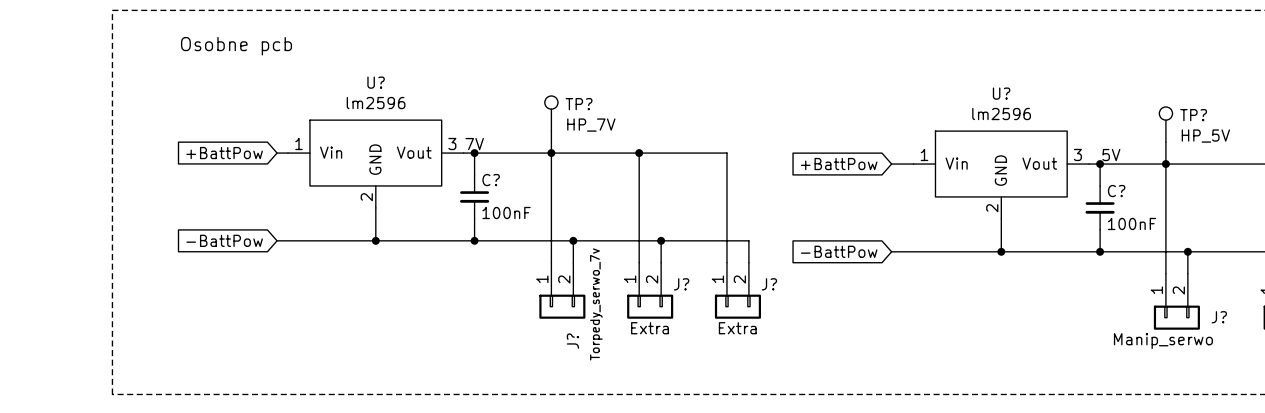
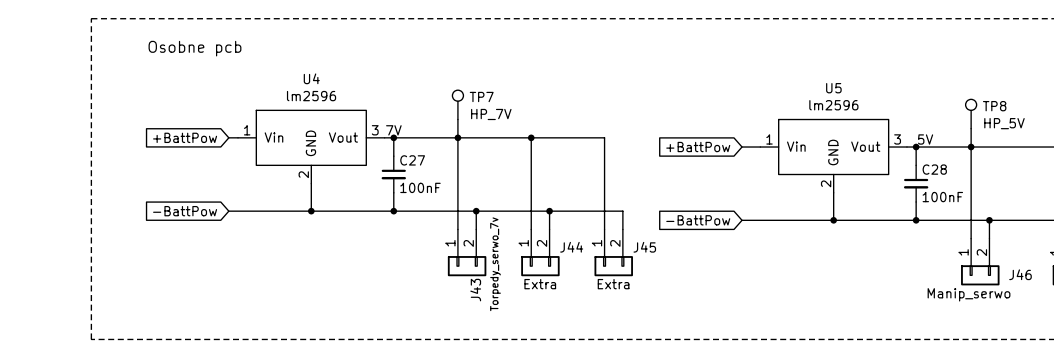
U? name: U? (376, 82) -> U4 (311, 78)
U? name: U? (1001, 93) -> U5 (833, 88)
TP? name: TP? (579, 104) -> TP7 (481, 97)
TP? name: TP? (1193, 115) -> TP8 (994, 106)
C? name: C? (491, 180) -> C27 (412, 160)
C? name: C? (1116, 191) -> C28 (934, 169)
J? name: J? (681, 284) -> J44 (571, 247)
J? name: J? (769, 284) -> J45 (644, 247)
J? name: J? (1219, 317) -> J46 (1020, 274)
J? name: J? (572, 341) -> J43 (475, 290)

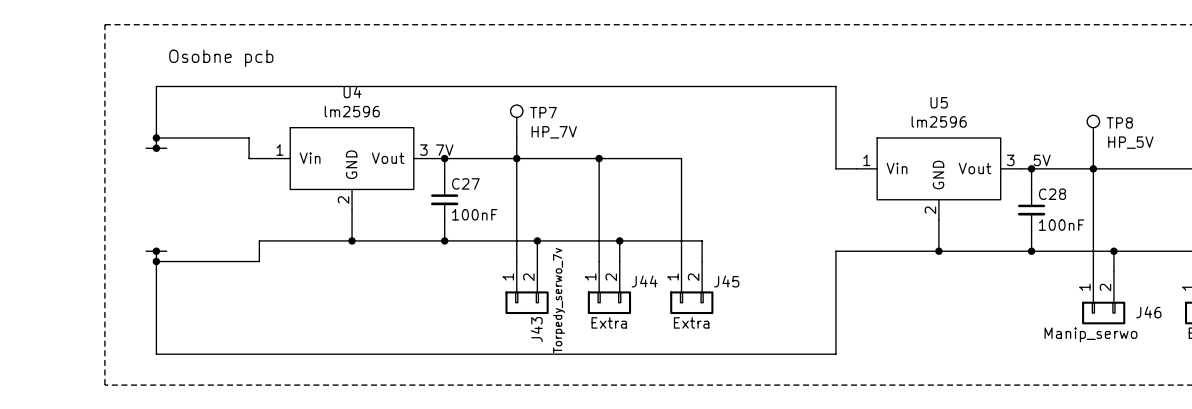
wire: none -> (156, 137) (249, 137) (249, 158) (259, 158)
junction: none -> (156, 137)
wire: none -> (146, 148) (166, 148)
wire: none -> (156, 148) (156, 86) (835, 86) (835, 168)
junction: none -> (156, 148)
global label: +BattPow (185, 137) -> none
global label: +BattPow (698, 147) -> none
global label: -BattPow (185, 211) -> none
wire: none -> (259, 240) (259, 261) (156, 261)
wire: none -> (146, 251) (166, 251)
wire: none -> (156, 251) (156, 354) (835, 354) (835, 251)
junction: none -> (156, 251)
global label: -BattPow (698, 220) -> none
junction: none -> (156, 261)

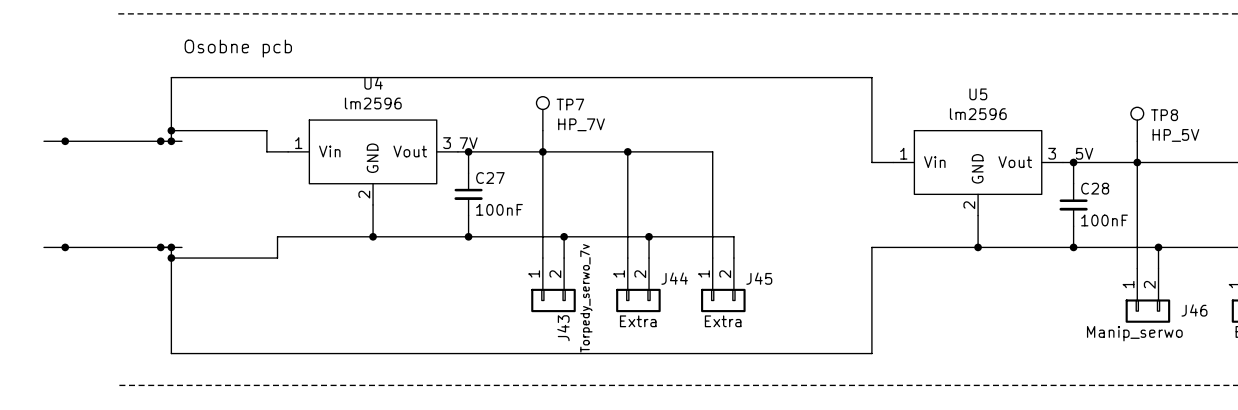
line: (104, 24) (104, 385) -> none
wire: none -> (43, 141) (160, 141)
junction: none -> (65, 141)
junction: none -> (160, 141)
wire: none -> (43, 247) (160, 247)
junction: none -> (65, 247)
junction: none -> (160, 247)

